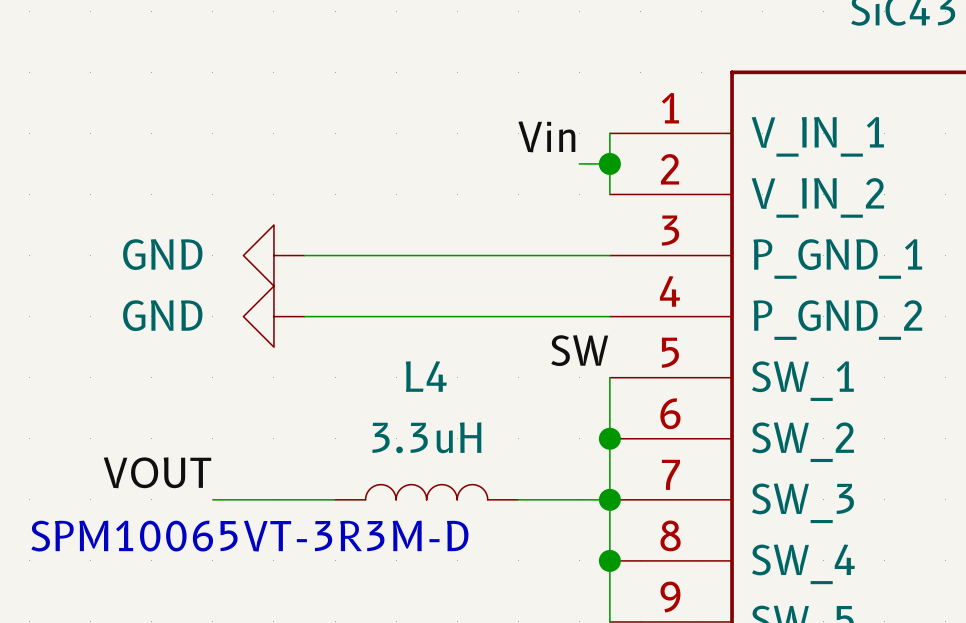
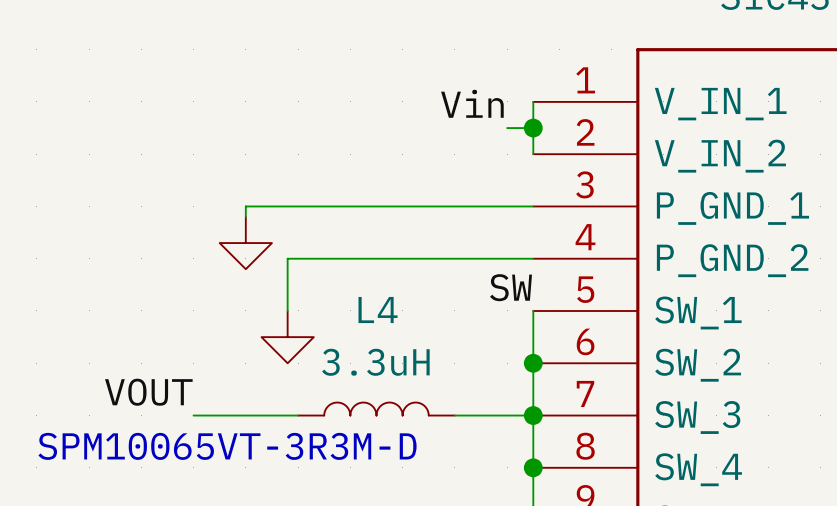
power symbol: GND (273, 255) -> none
power symbol text: GND (162, 315) -> none
power symbol rotation: 0° (273, 316) -> 90° counterclockwise (245, 243)
wire: (304, 316) (322, 316) -> (287, 310) (287, 258)
power symbol: none -> (287, 337)

